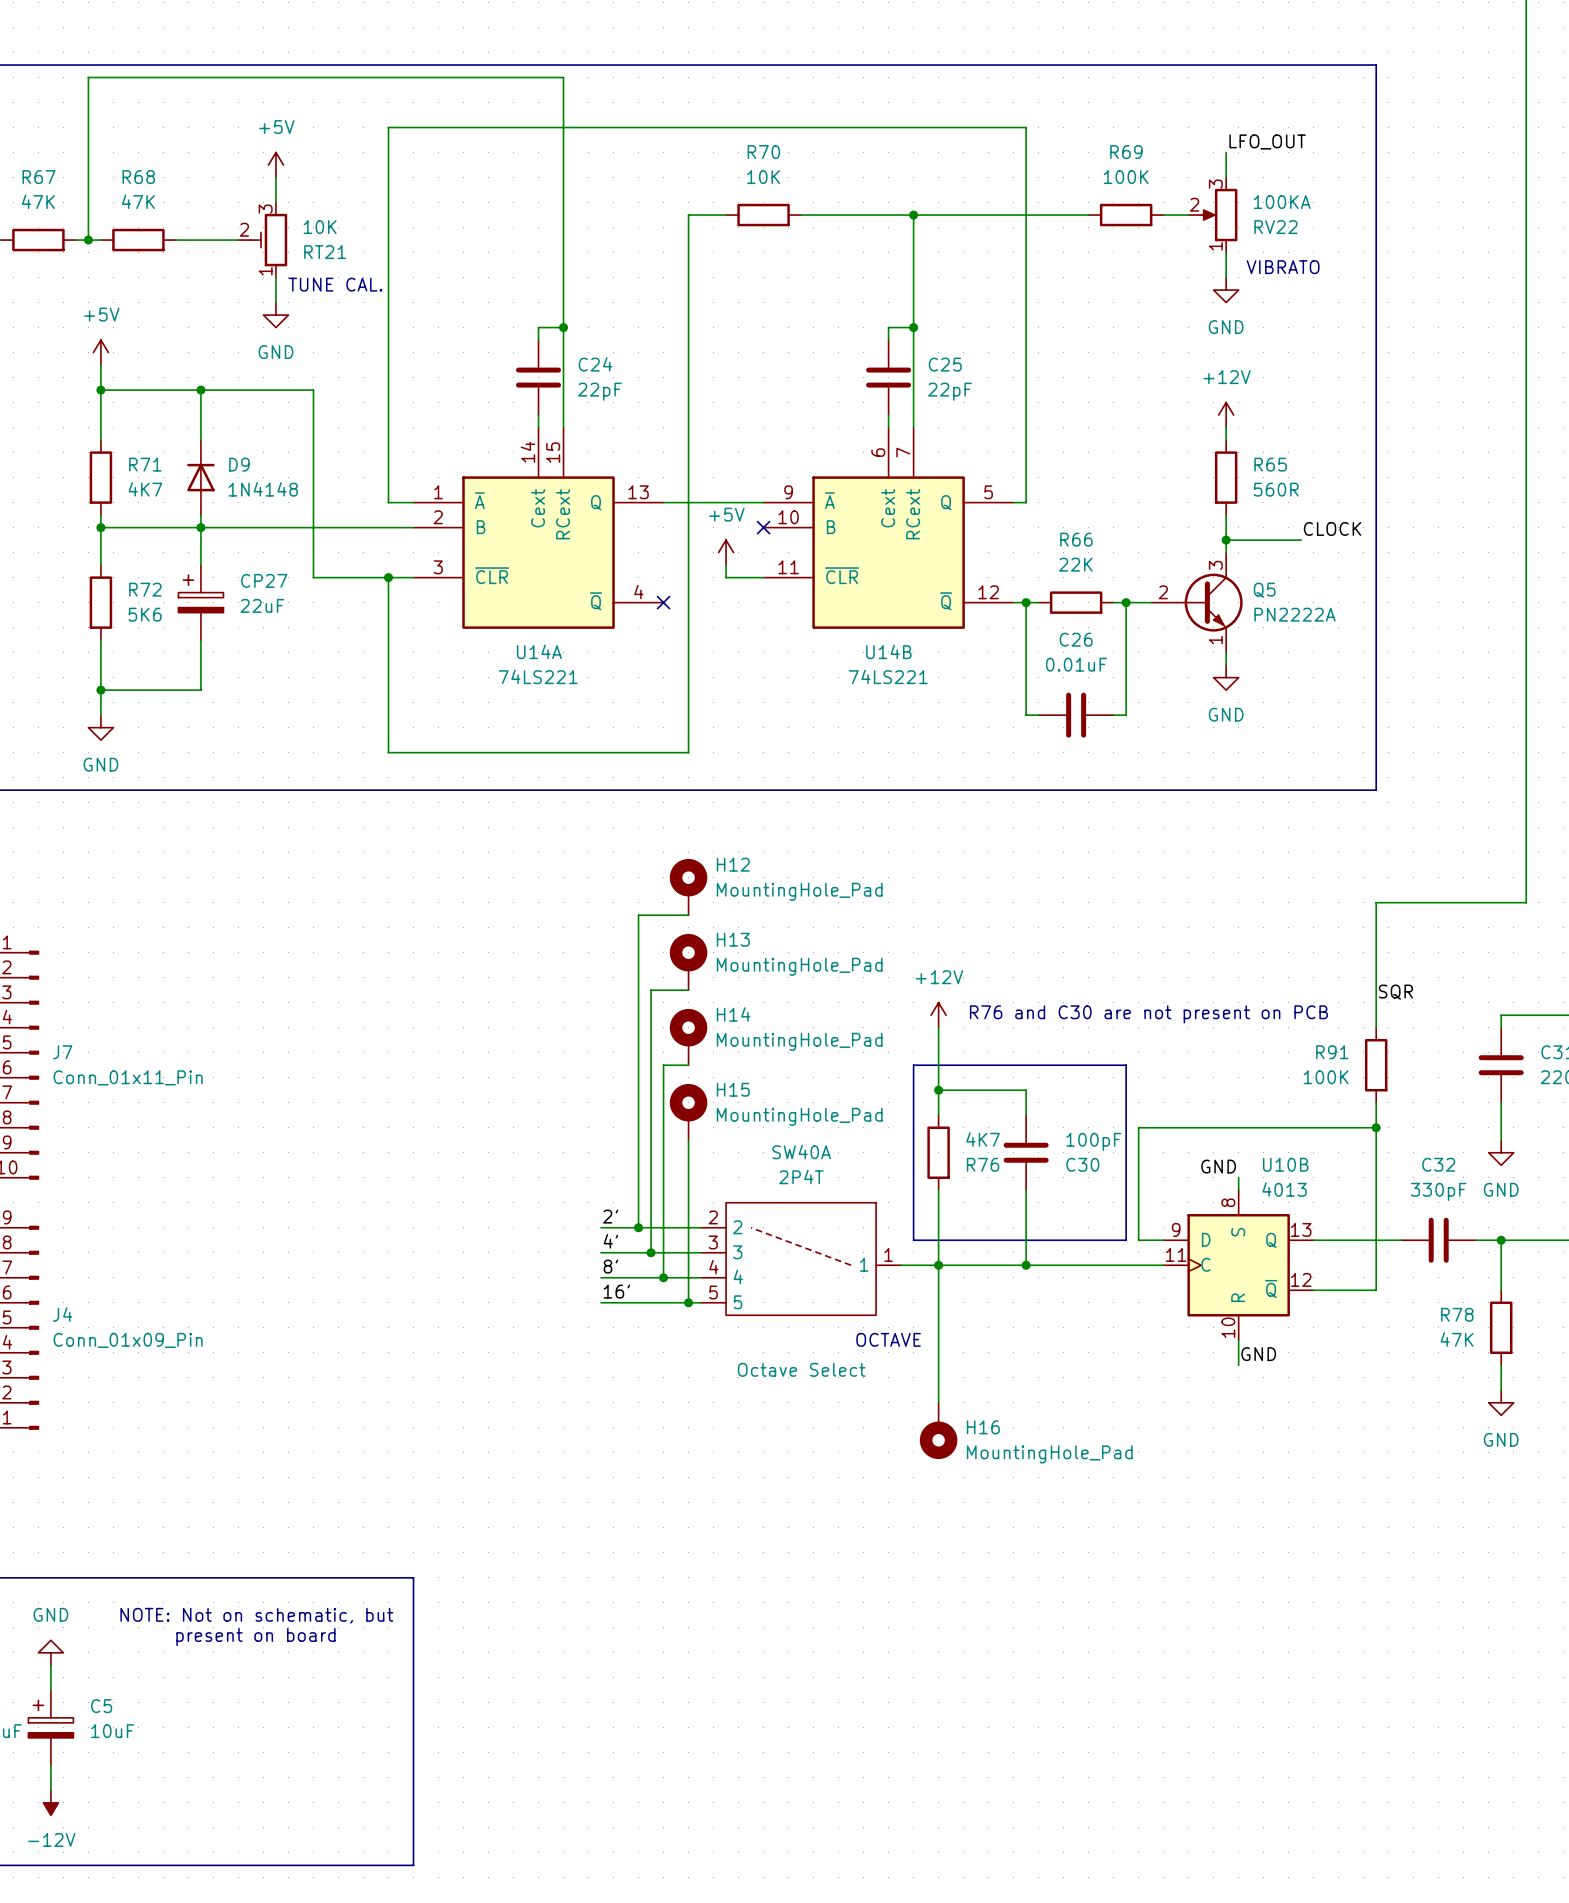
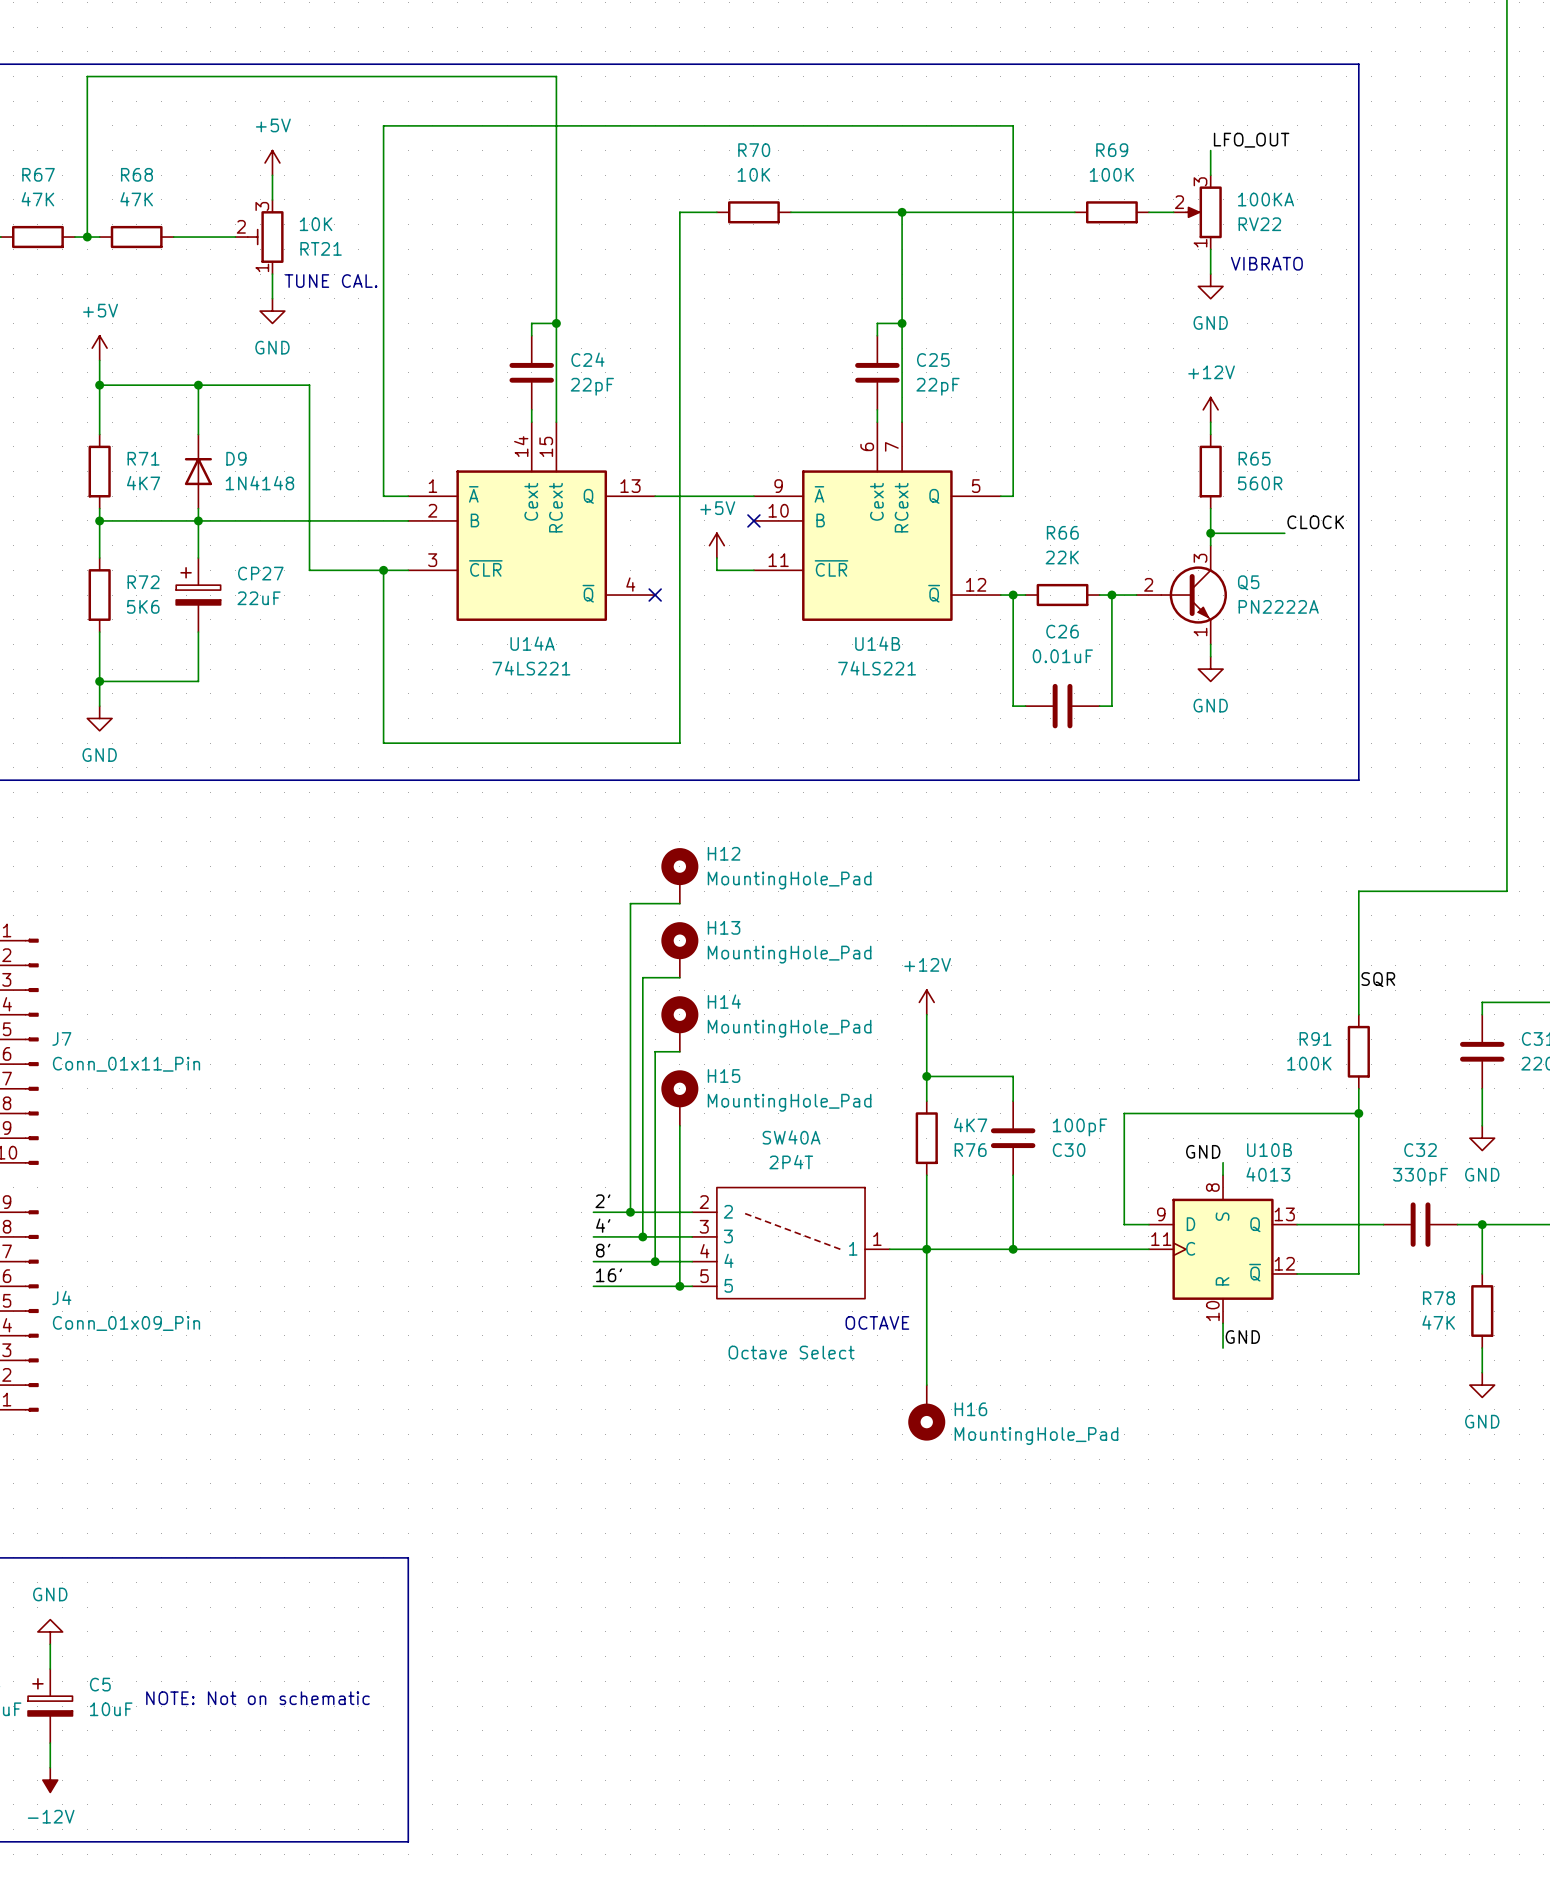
text: R76 and C30 are not present on PCB (1148, 1014) -> none
line: (913, 1065) (1126, 1065) (1126, 1240) (913, 1240) (913, 1065) -> none
text: NOTE: Not on schematic, but (256, 1615) -> none
text: present on board (255, 1637) -> none
text: none -> NOTE: Not on schematic (257, 1698)

